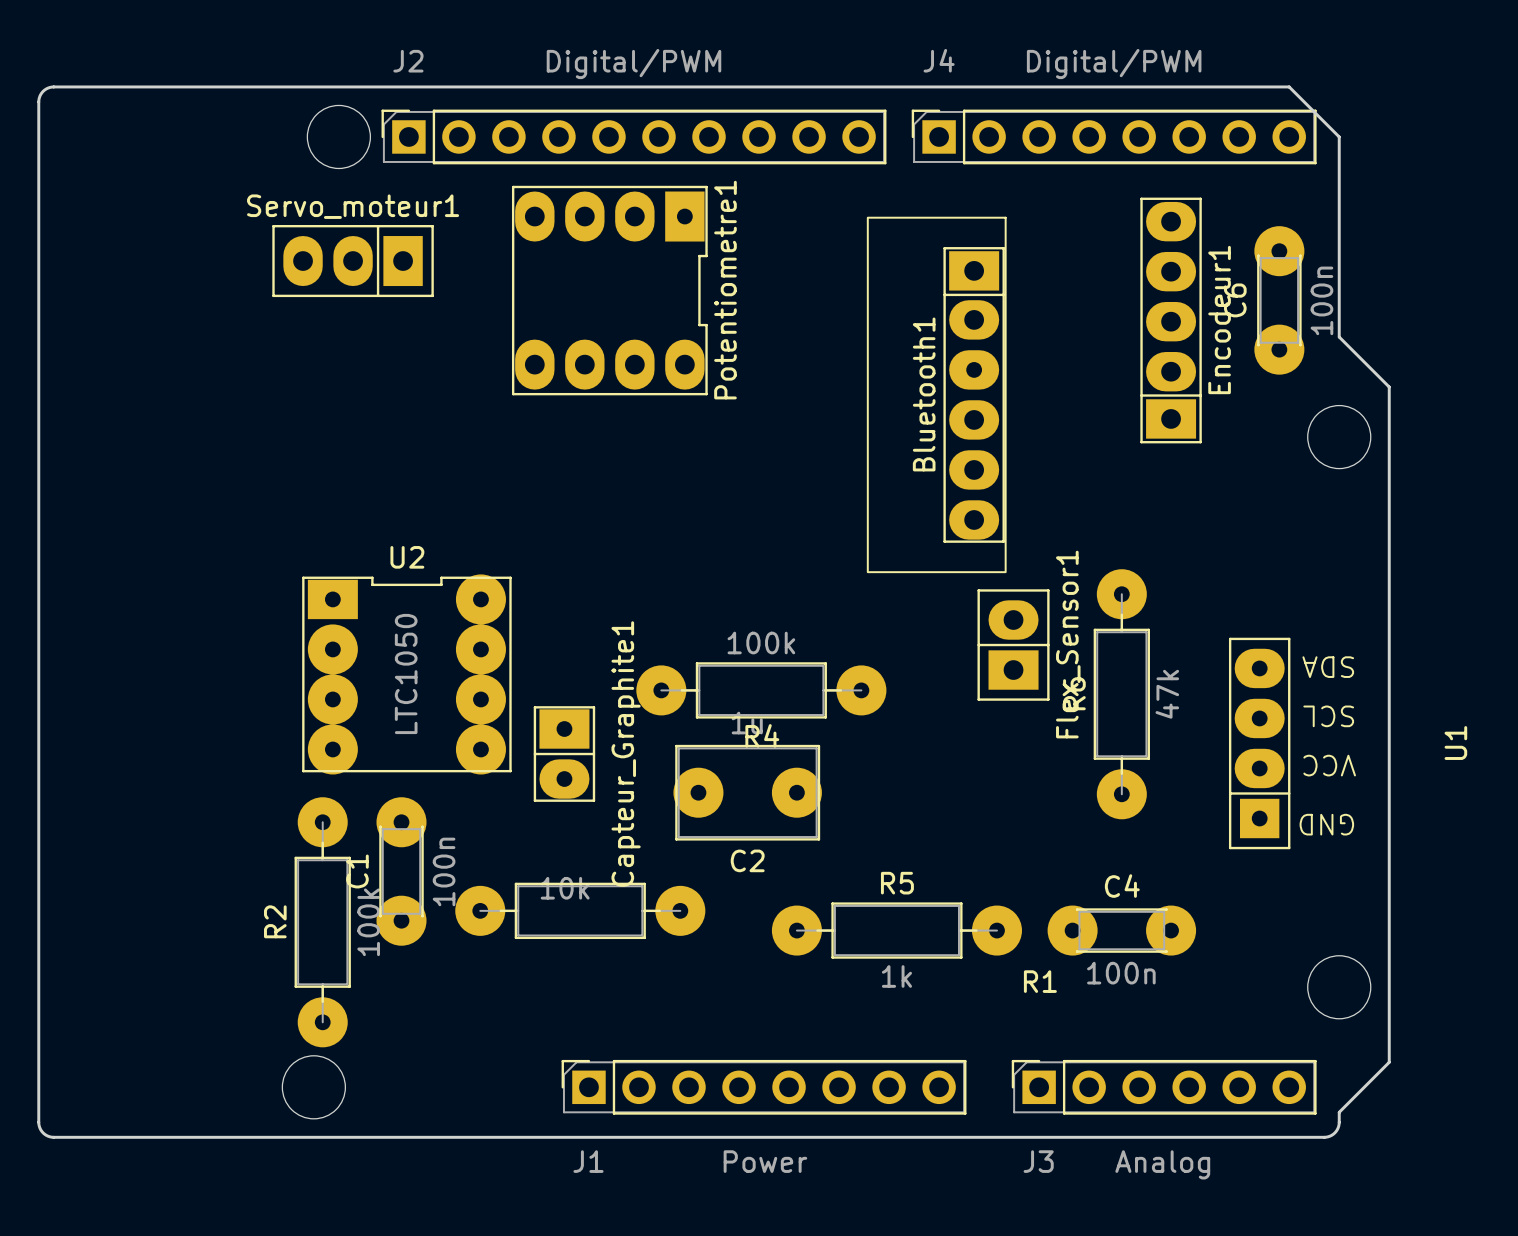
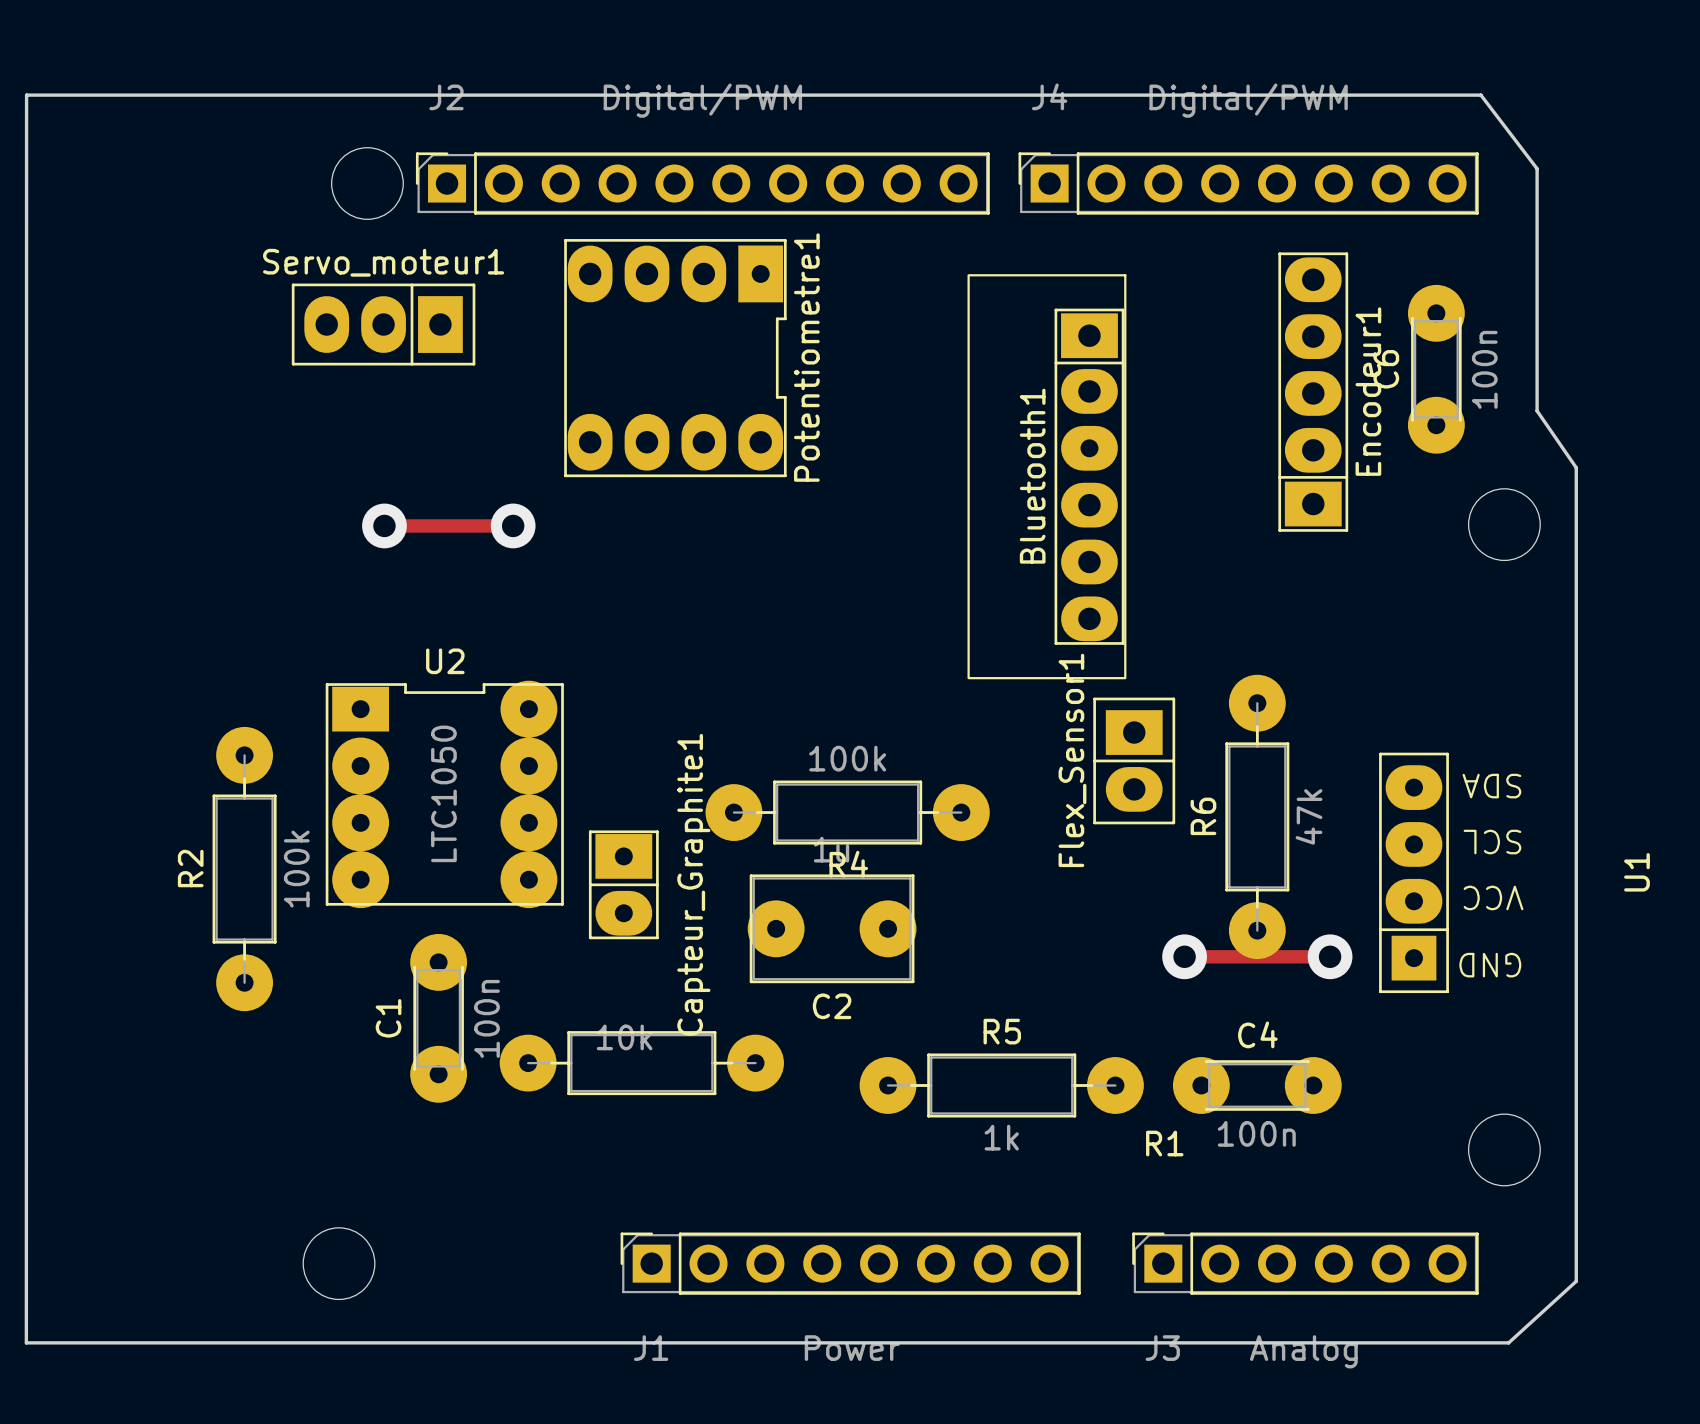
board edge: (53, 86) (1289, 86) (1339, 136) (1339, 337) (1389, 387) (1389, 1062) (1339, 1112) (1339, 1124) (1336, 1131) (1331, 1135) (1324, 1137) (53, 1137) (44, 1134) (40, 1129) (38, 1122) (38, 101) (43, 91) (53, 86) -> (26, 95) (26, 1342) (1508, 1342) (1576, 1281) (1576, 467) (1537, 410) (1537, 168) (1480, 95) (26, 95)
track: none -> (384, 525) (513, 525)
via: none -> (384, 525)
via: none -> (513, 525)
Flex_Sensor1 rotation: 0° (1013, 645) -> 180° (1134, 760)
track: none -> (1184, 956) (1330, 956)
via: none -> (1184, 956)
via: none -> (1330, 956)
R2 position: (322, 922) -> (244, 869)

